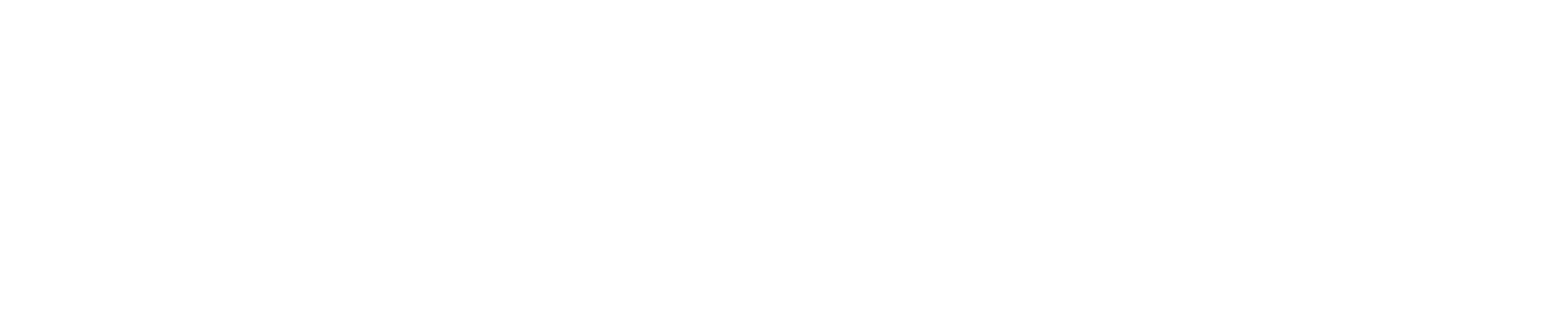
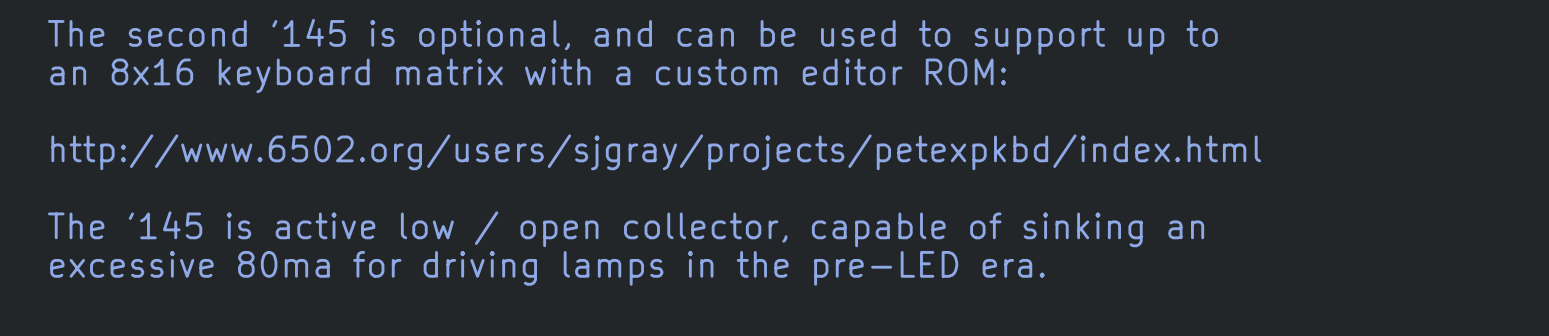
text: none -> The second '145 is optional, and can be used to support up to (632, 36)
text: none -> an 8x16 keyboard matrix with a custom editor ROM: (528, 75)
text: none -> http://www.6502.org/users/sjgray/projects/petexpkbd/index.html (656, 152)
text: none -> The '145 is active low / open collector, capable of sinking an (626, 229)
text: none -> excessive 80ma for driving lamps in the pre-LED era. (547, 268)

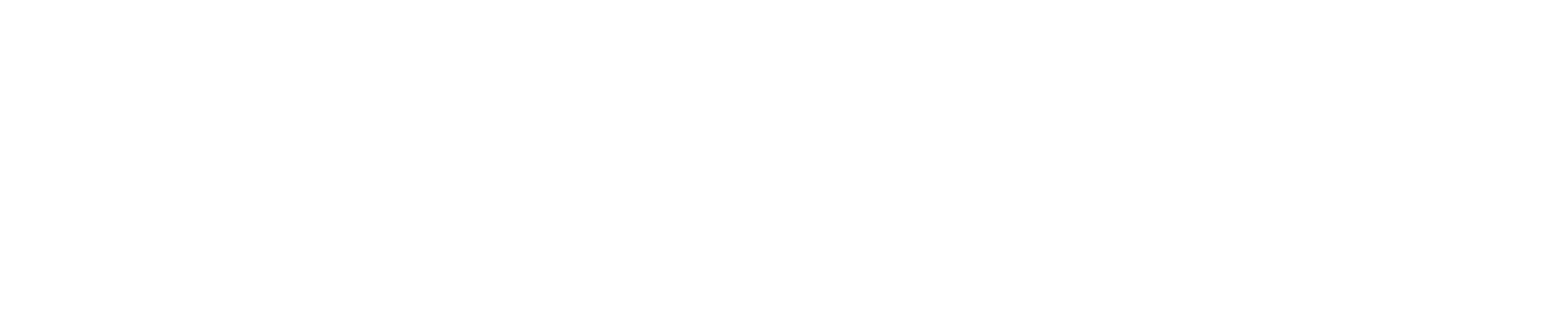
text: The second '145 is optional, and can be used to support up to (632, 36) -> none
text: an 8x16 keyboard matrix with a custom editor ROM: (528, 75) -> none
text: http://www.6502.org/users/sjgray/projects/petexpkbd/index.html (656, 152) -> none
text: The '145 is active low / open collector, capable of sinking an (626, 229) -> none
text: excessive 80ma for driving lamps in the pre-LED era. (547, 268) -> none

